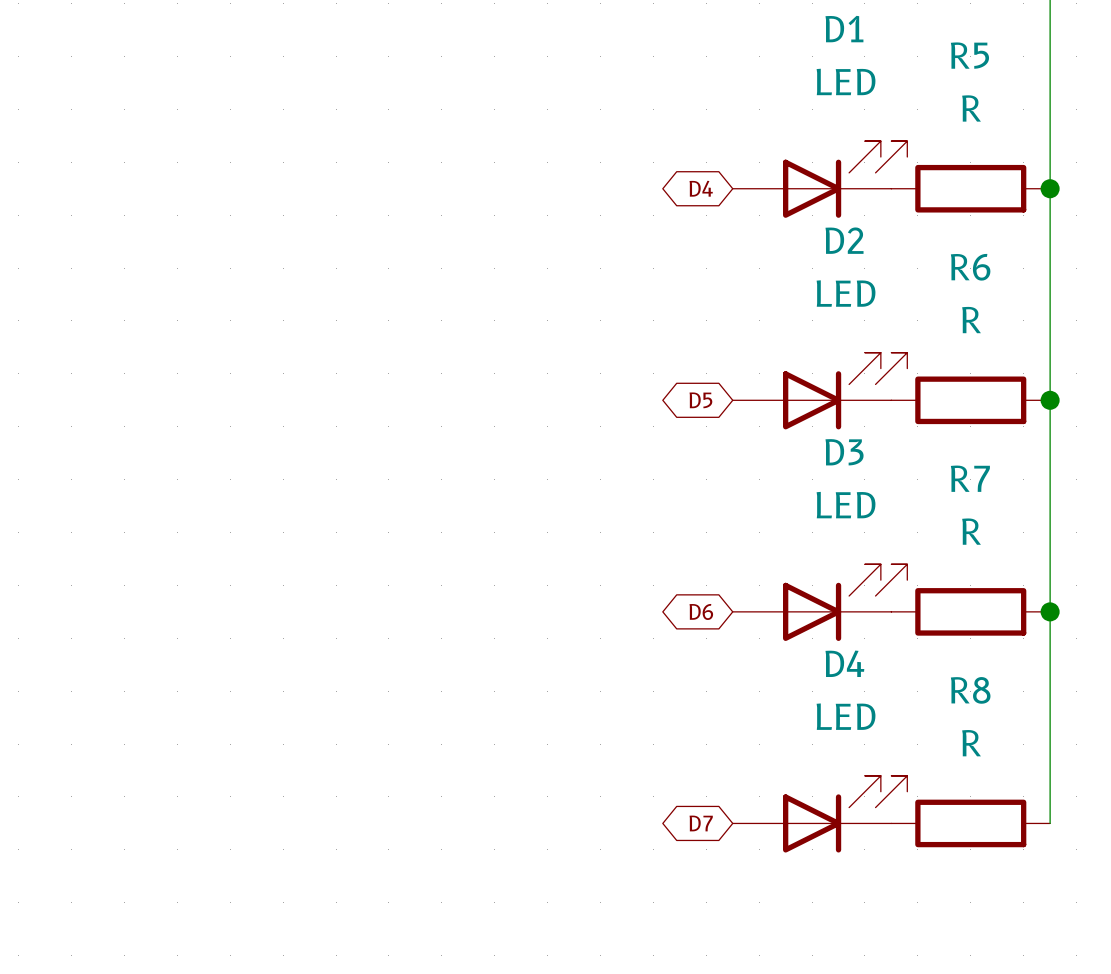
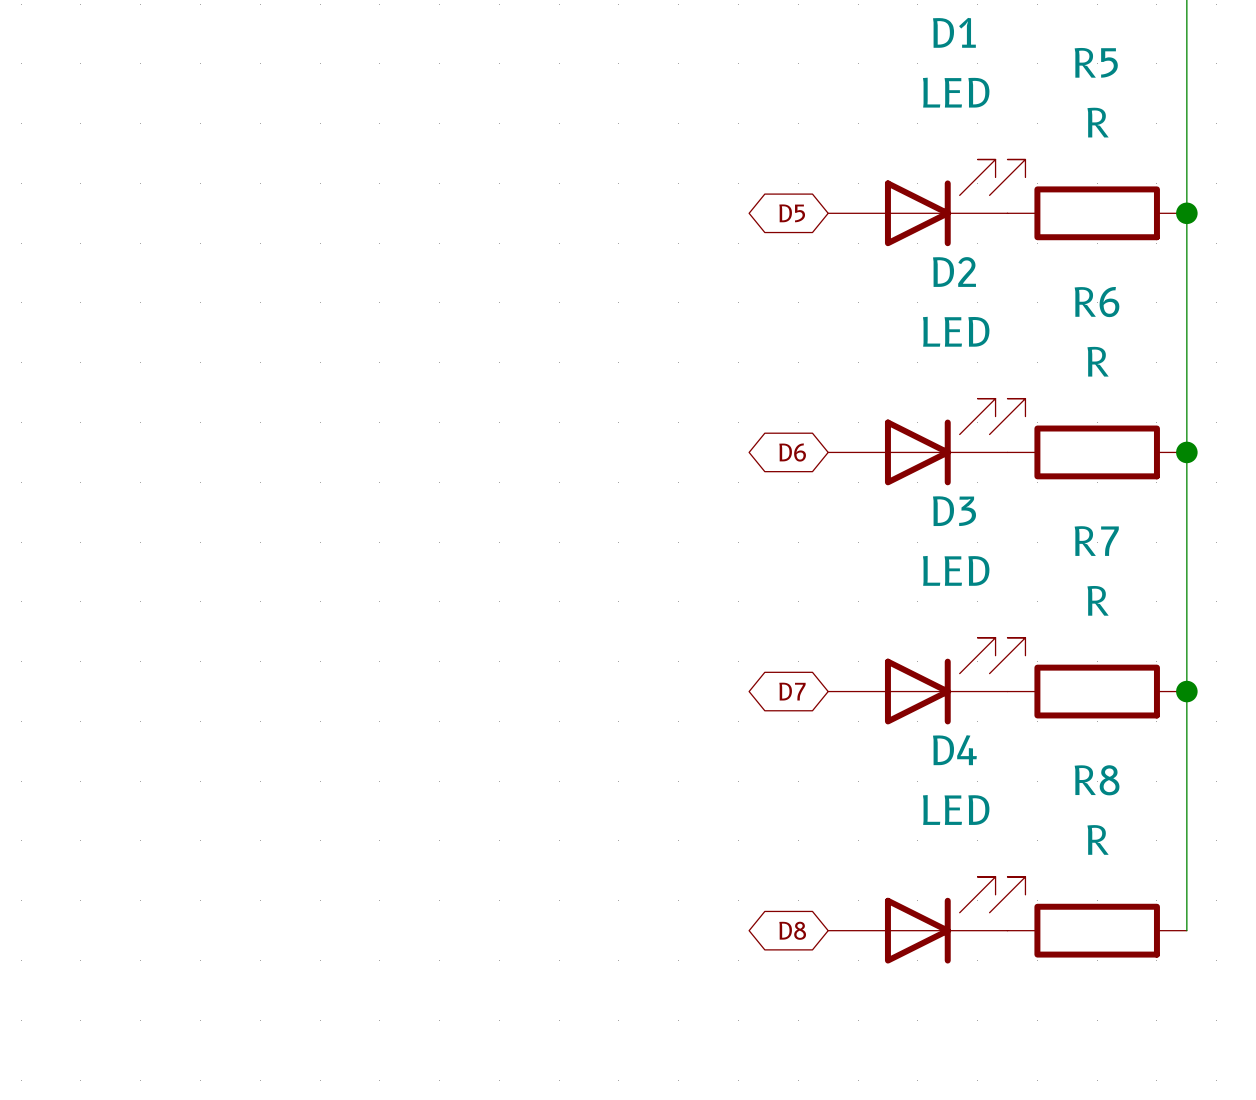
global label: D4 (701, 188) -> D5 (792, 213)
global label: D5 (700, 400) -> D6 (792, 452)
global label: D6 (701, 611) -> D7 (792, 691)
global label: D7 (701, 823) -> D8 (792, 930)

